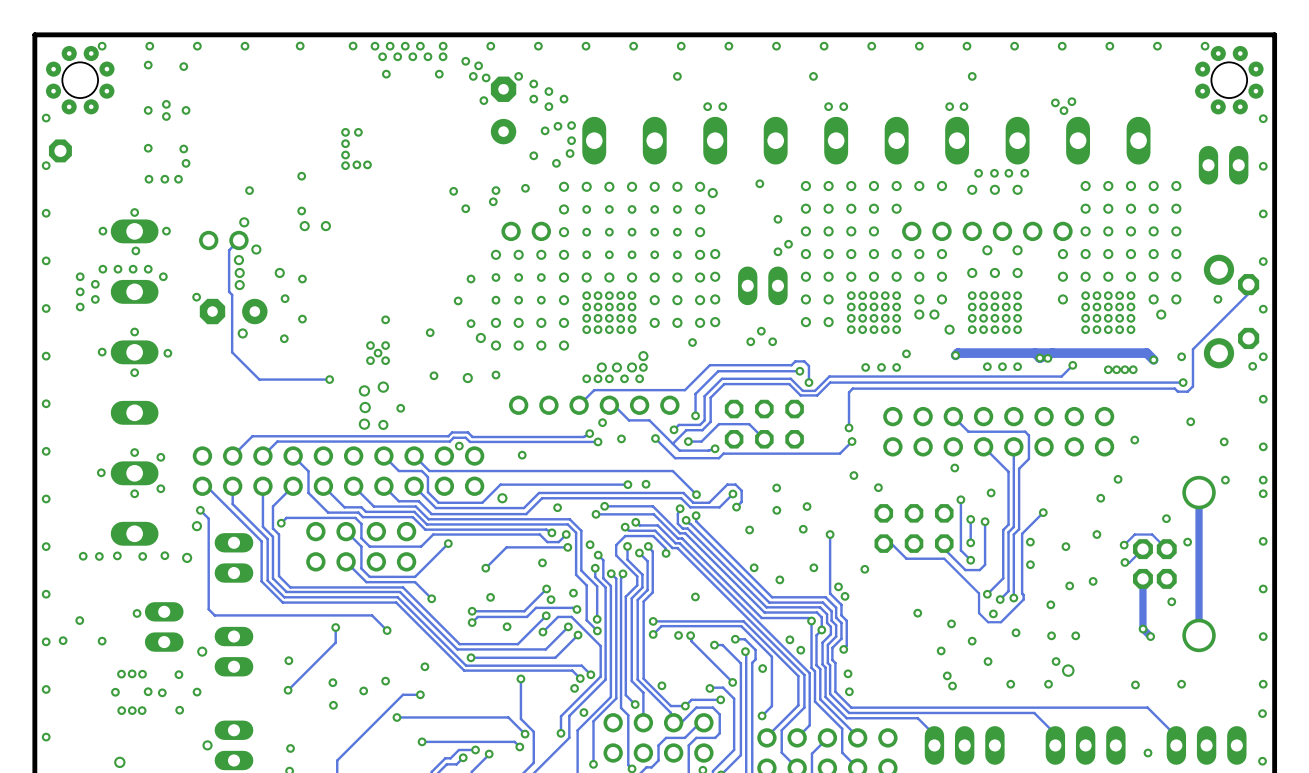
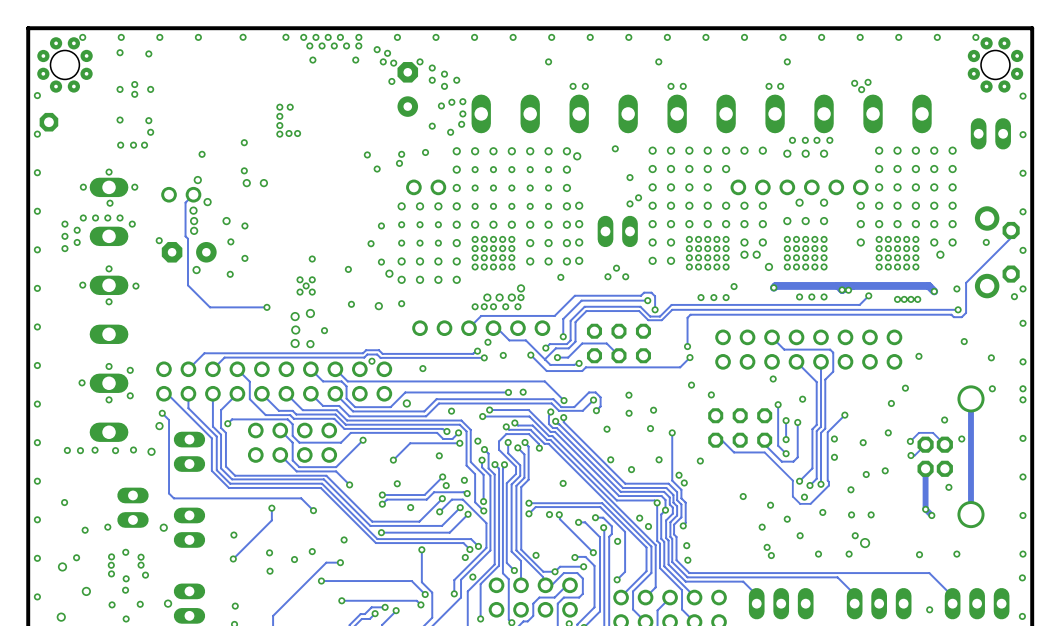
via: (137, 613) -> none
via: (63, 640) -> none
via: (102, 641) -> none
via: none -> (107, 527)
via: none -> (85, 530)
via: (132, 673) -> none
via: (121, 674) -> none
via: (142, 674) -> none
via: (178, 674) -> none
via: none -> (125, 552)
via: none -> (111, 556)
via: none -> (76, 557)
via: none -> (141, 557)
via: (148, 691) -> none
via: (115, 692) -> none
via: (162, 692) -> none
via: (197, 692) -> none
via: none -> (141, 565)
via: none -> (111, 565)
via: none -> (62, 566)
via: none -> (111, 573)
via: (121, 710) -> none
via: (132, 710) -> none
via: (142, 710) -> none
via: none -> (126, 578)
via: none -> (125, 590)
via: none -> (86, 591)
via: none -> (112, 604)
via: none -> (140, 604)
via: none -> (61, 617)
via: (119, 762) -> none
via: none -> (126, 618)

